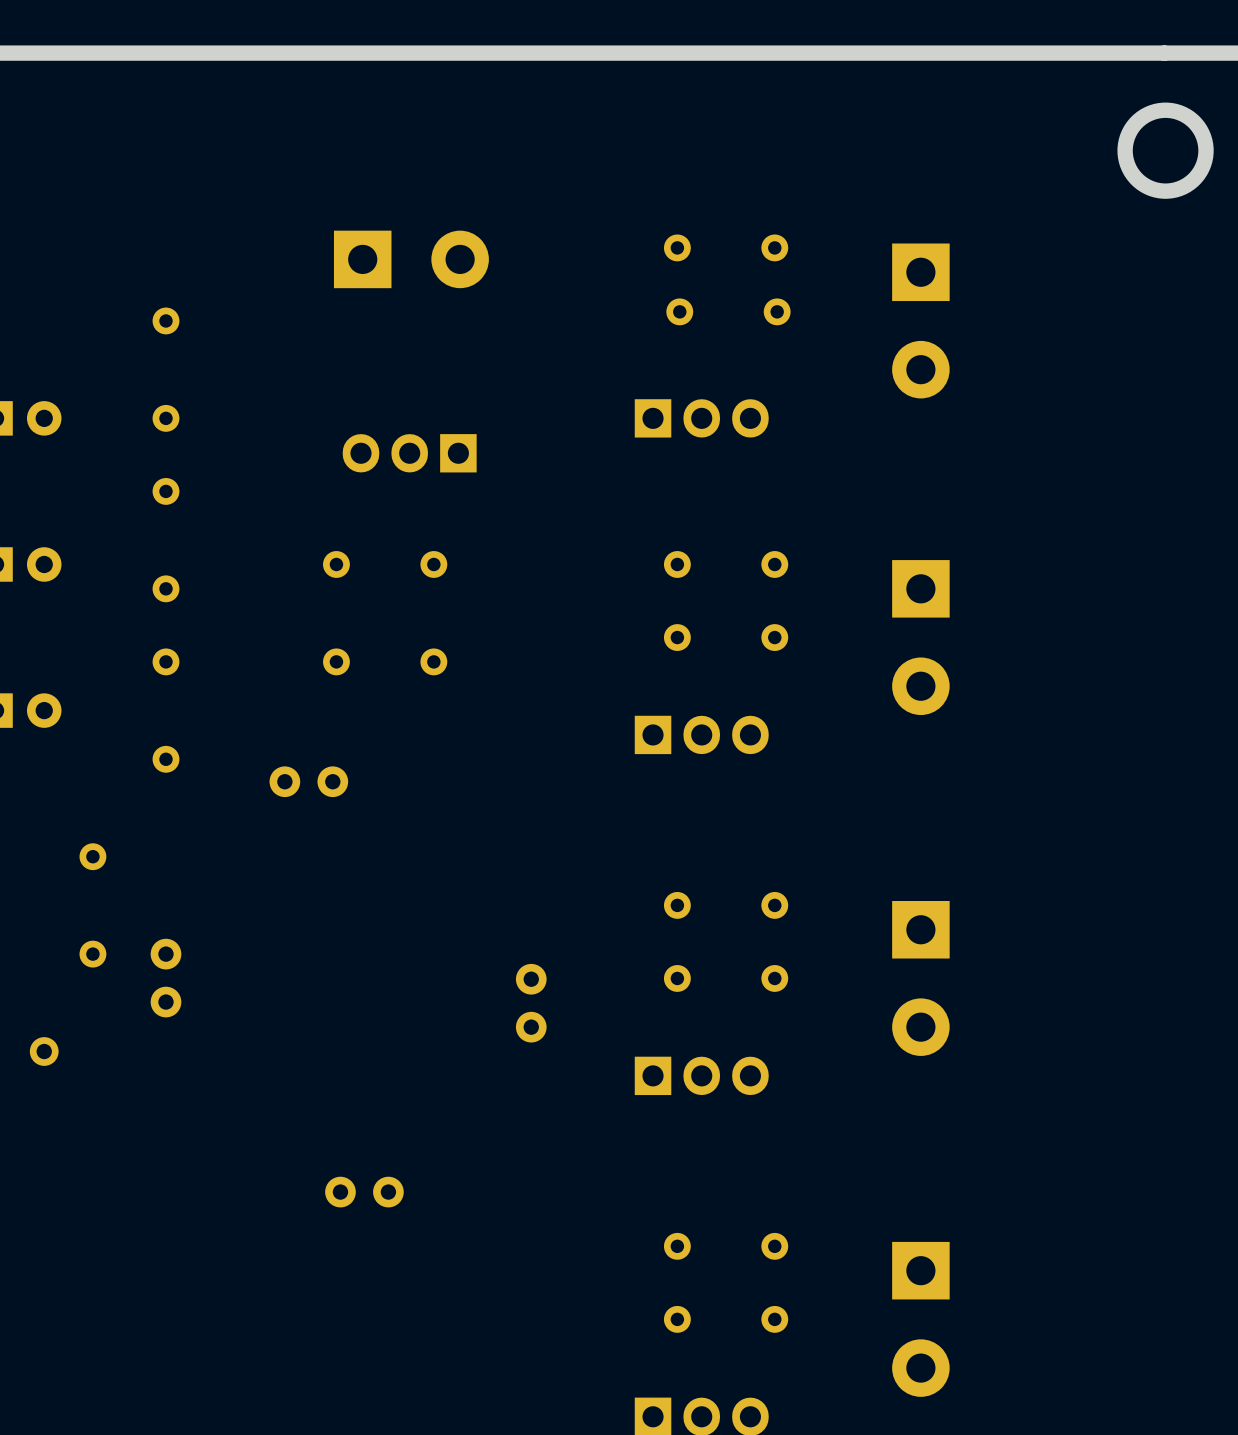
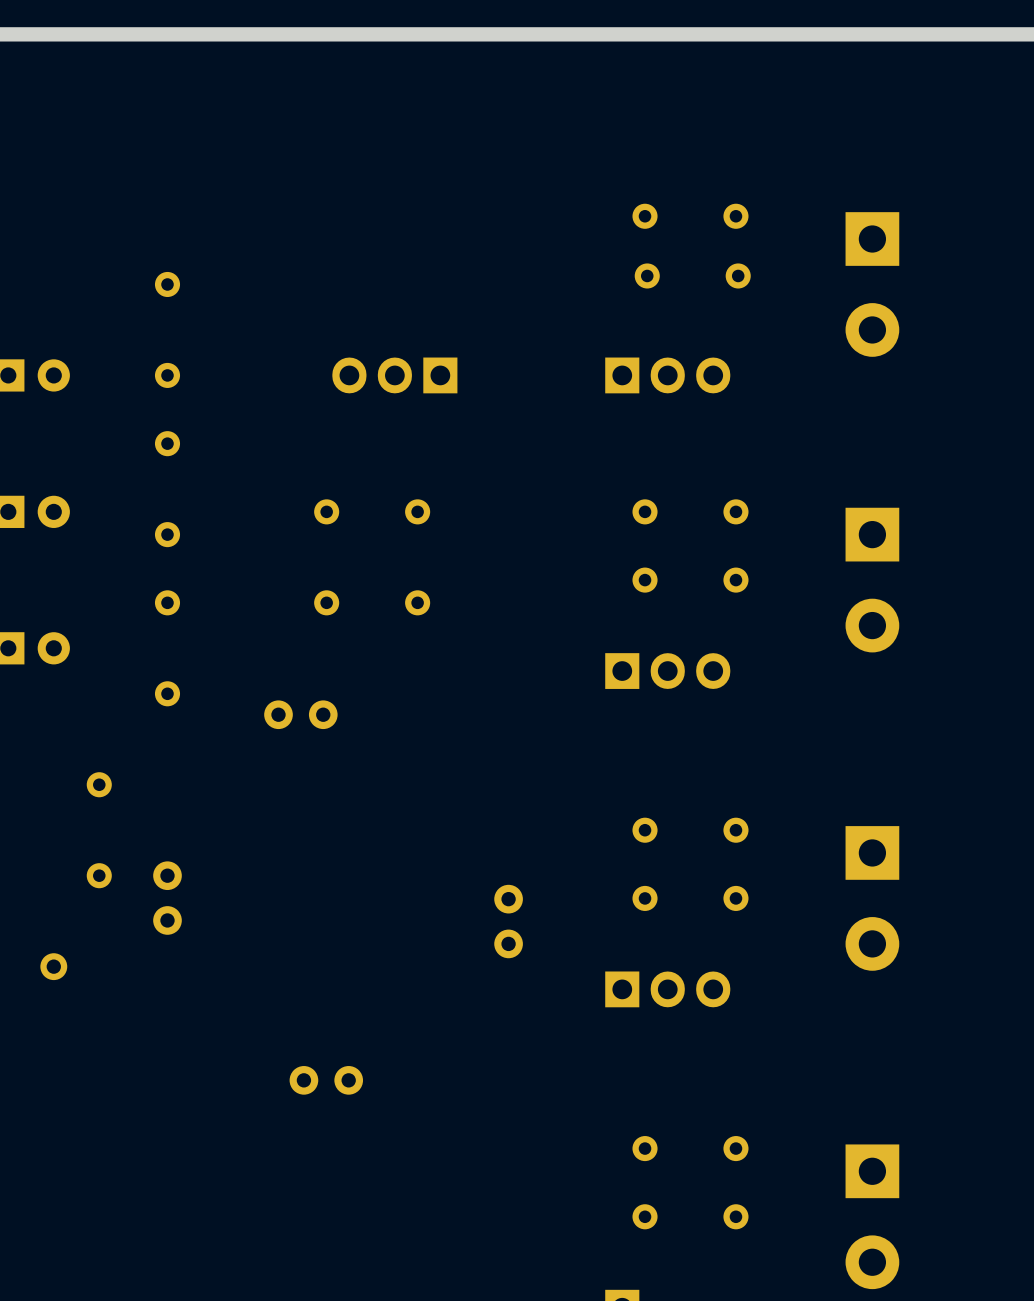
part: (411, 259) -> none
part position: (409, 453) -> (394, 375)
part position: (364, 1192) -> (326, 1080)

